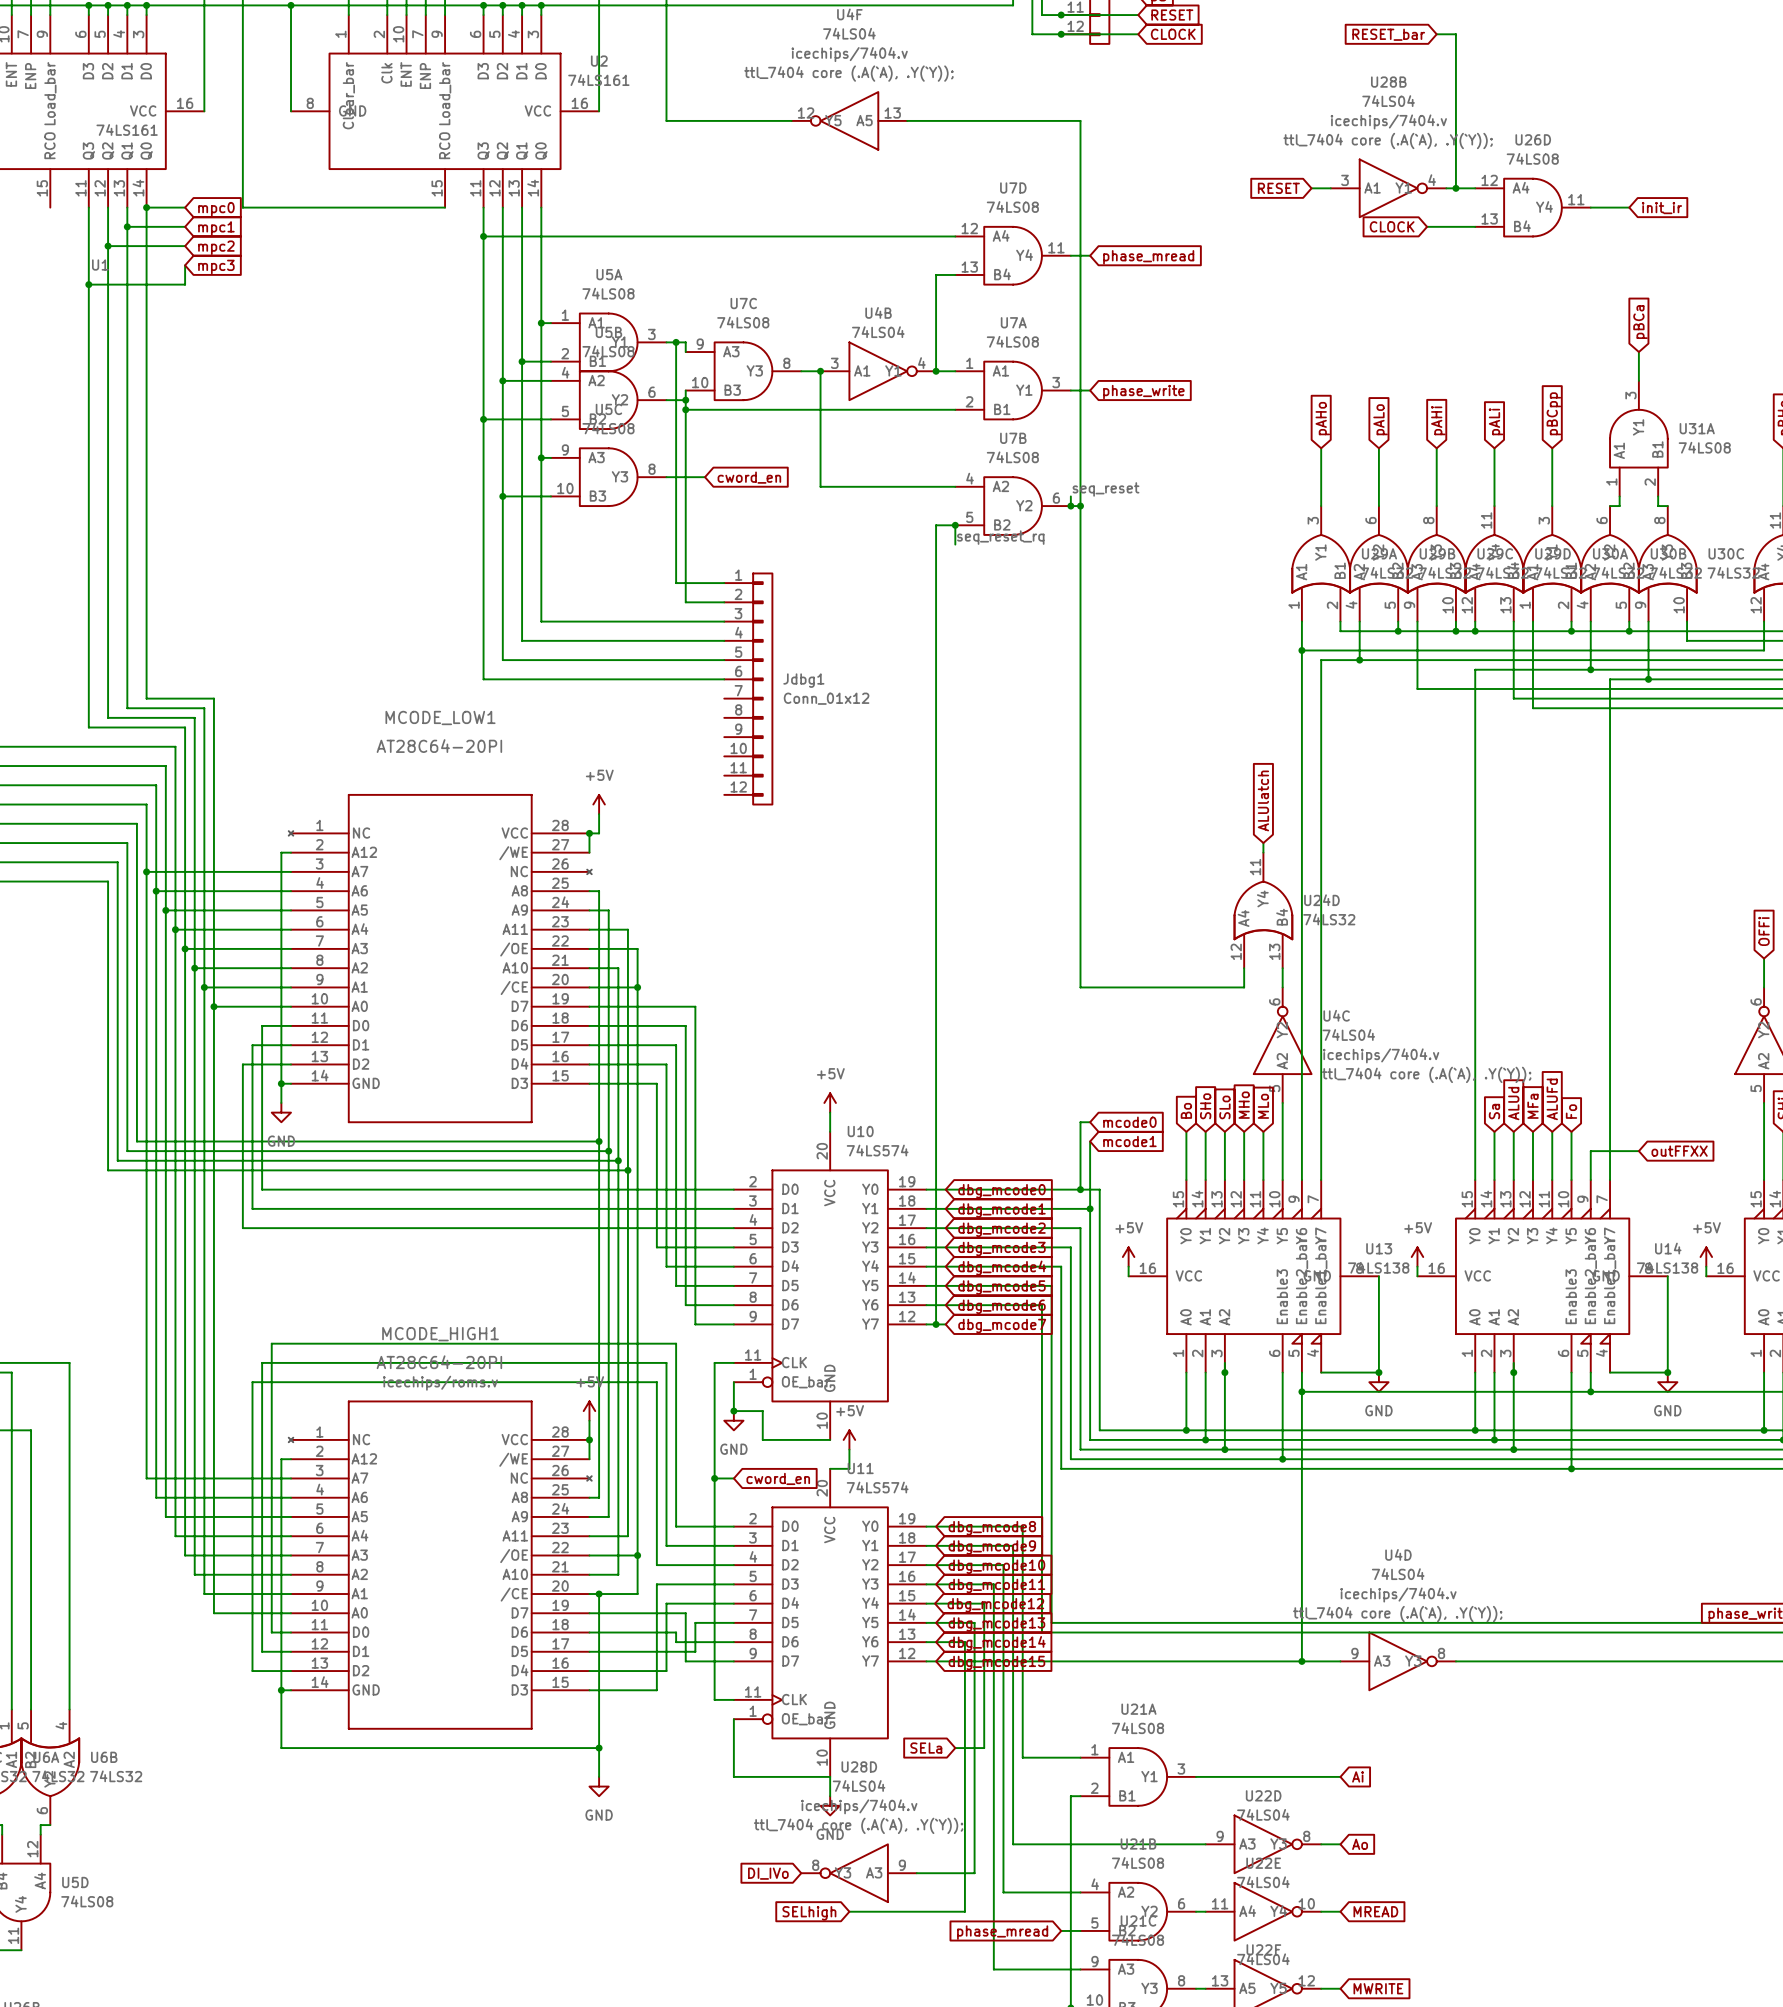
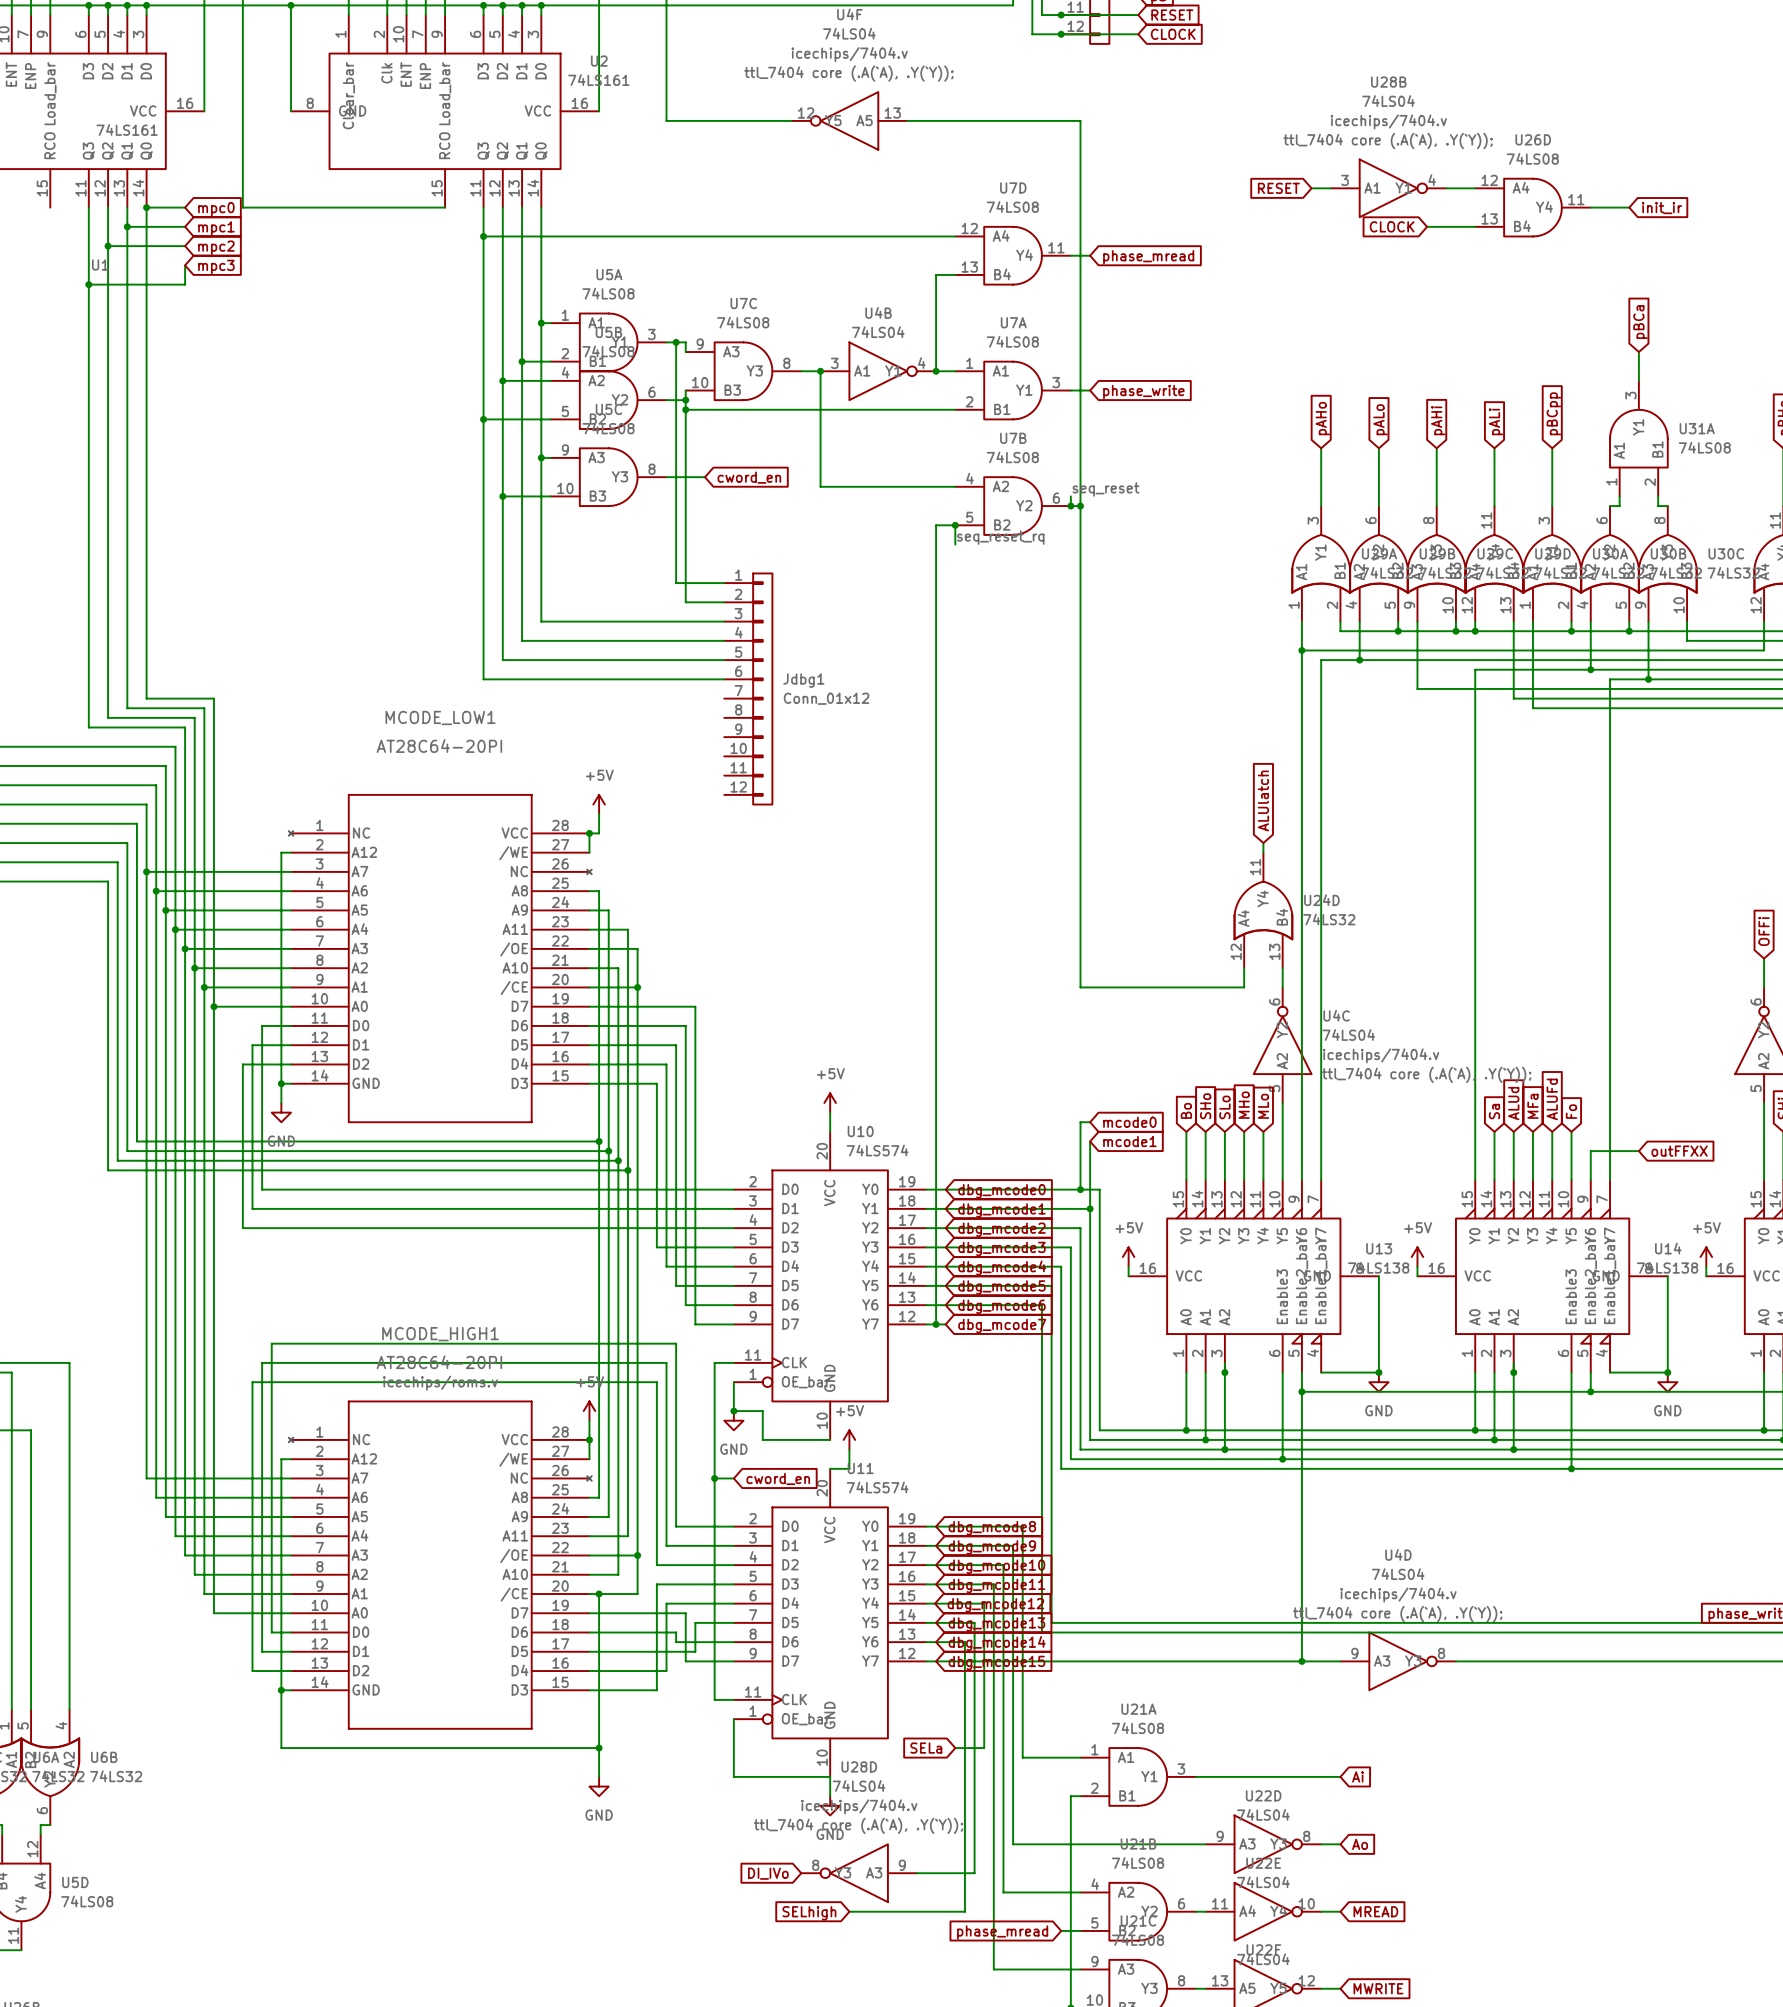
global label: RESET_bar (1388, 34) -> none
wire: (1436, 34) (1455, 34) (1455, 188) -> none
junction: (1455, 188) -> none

